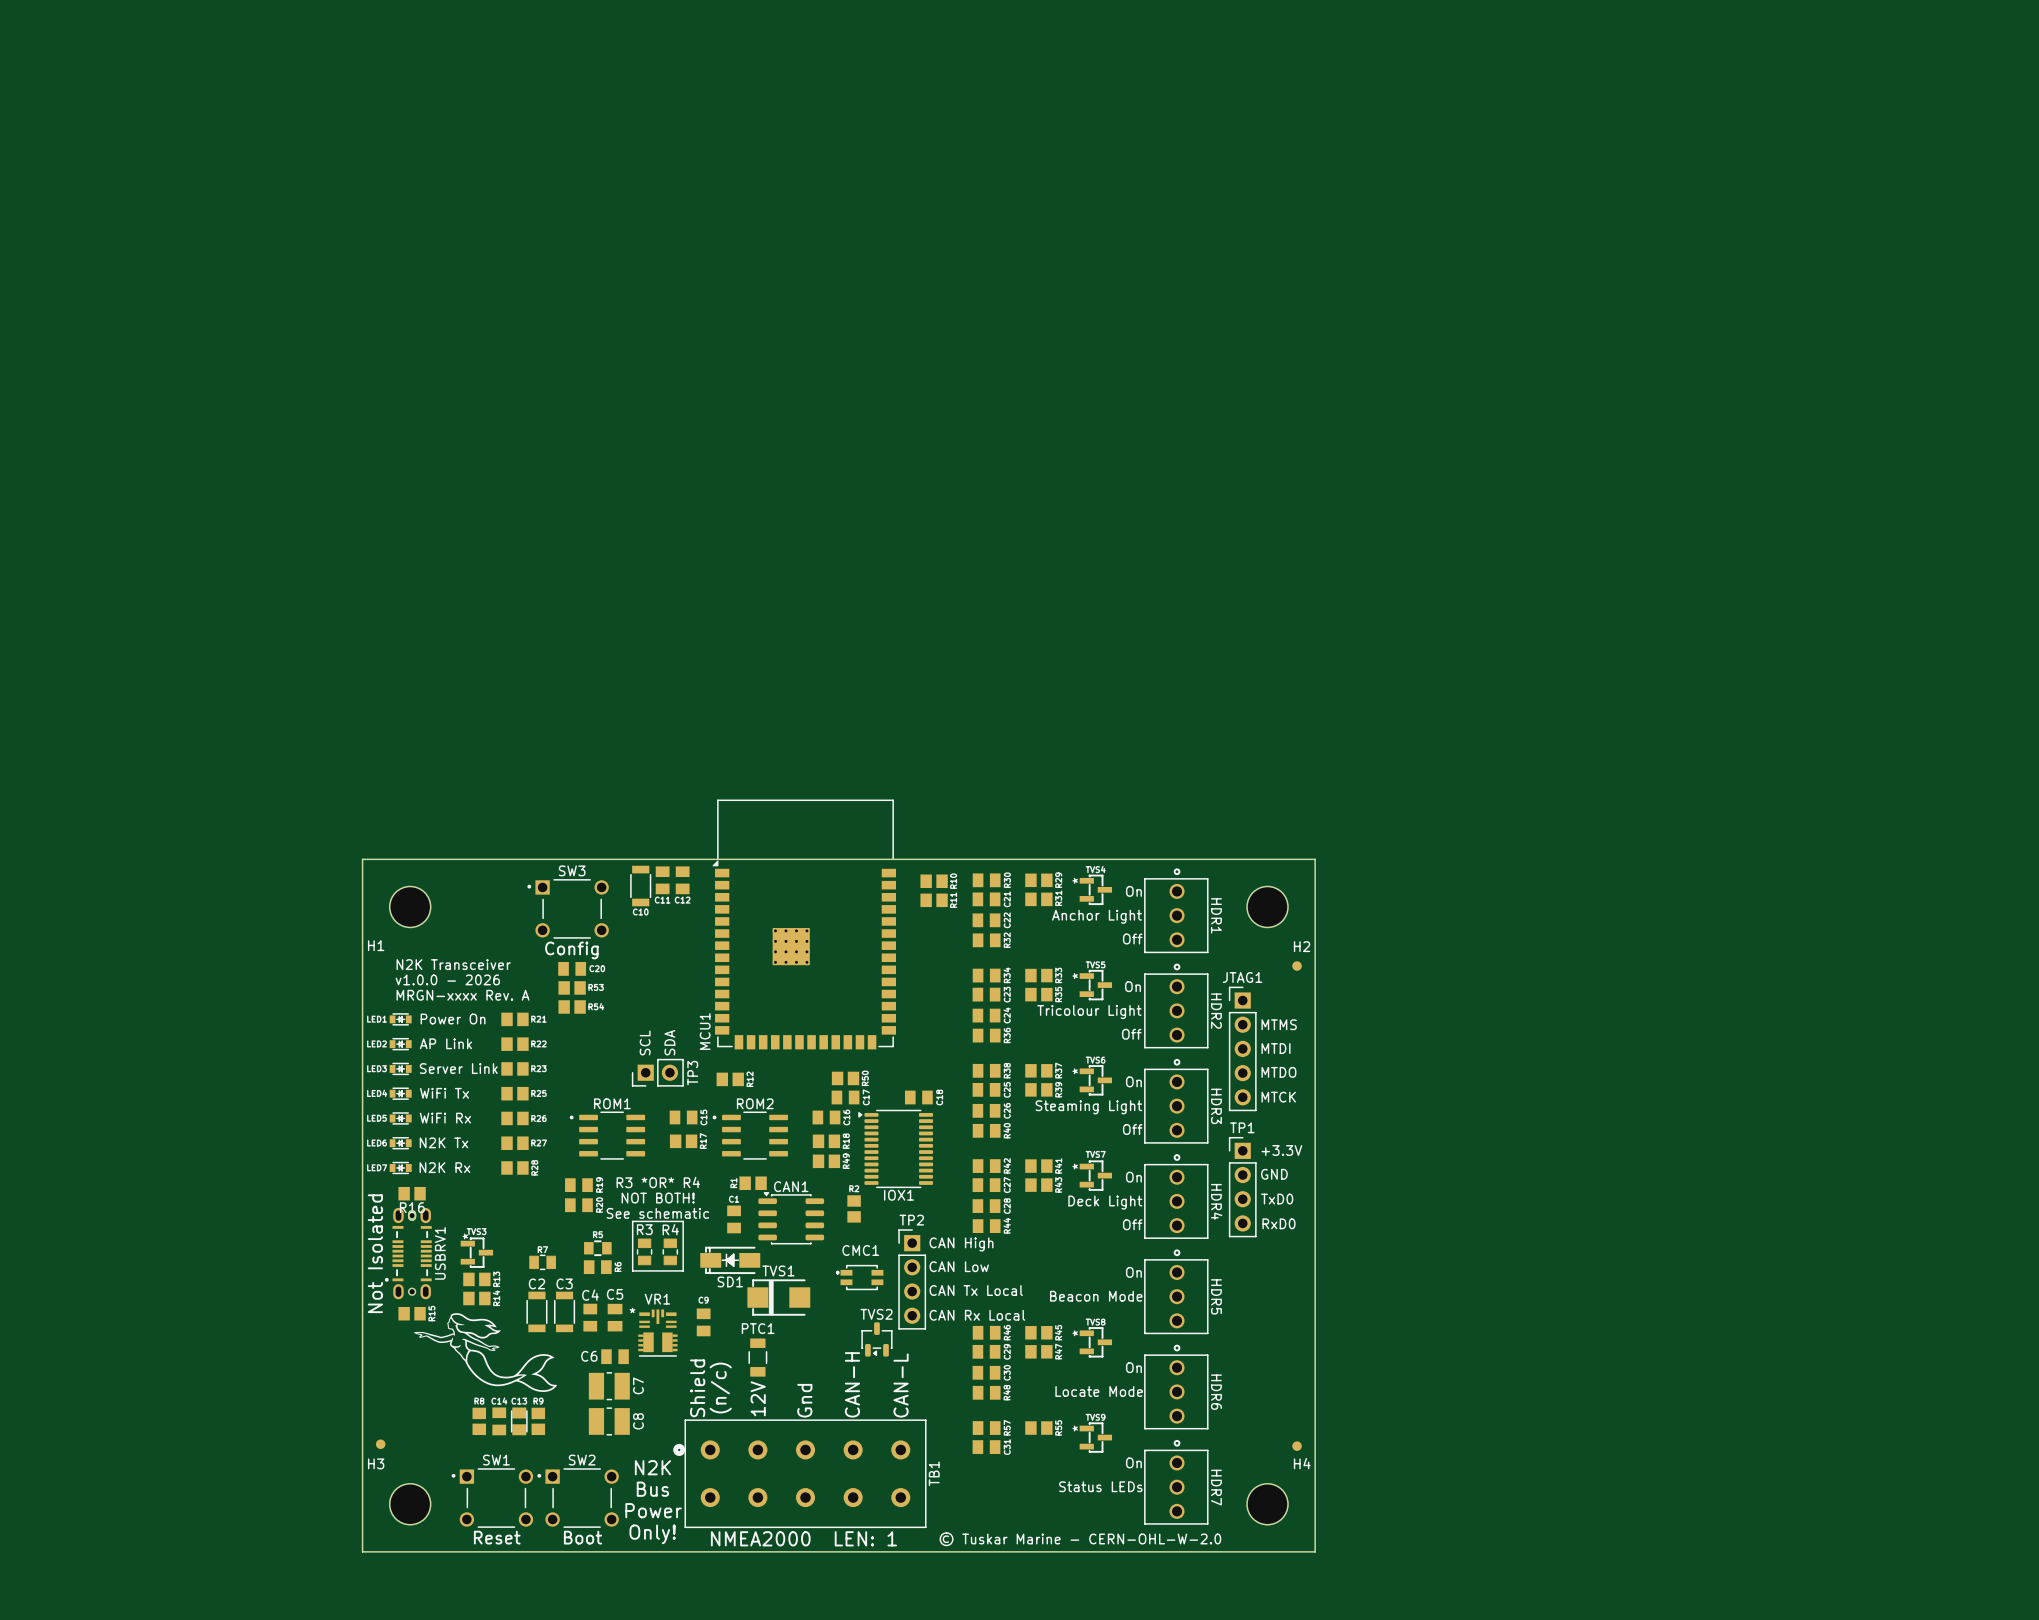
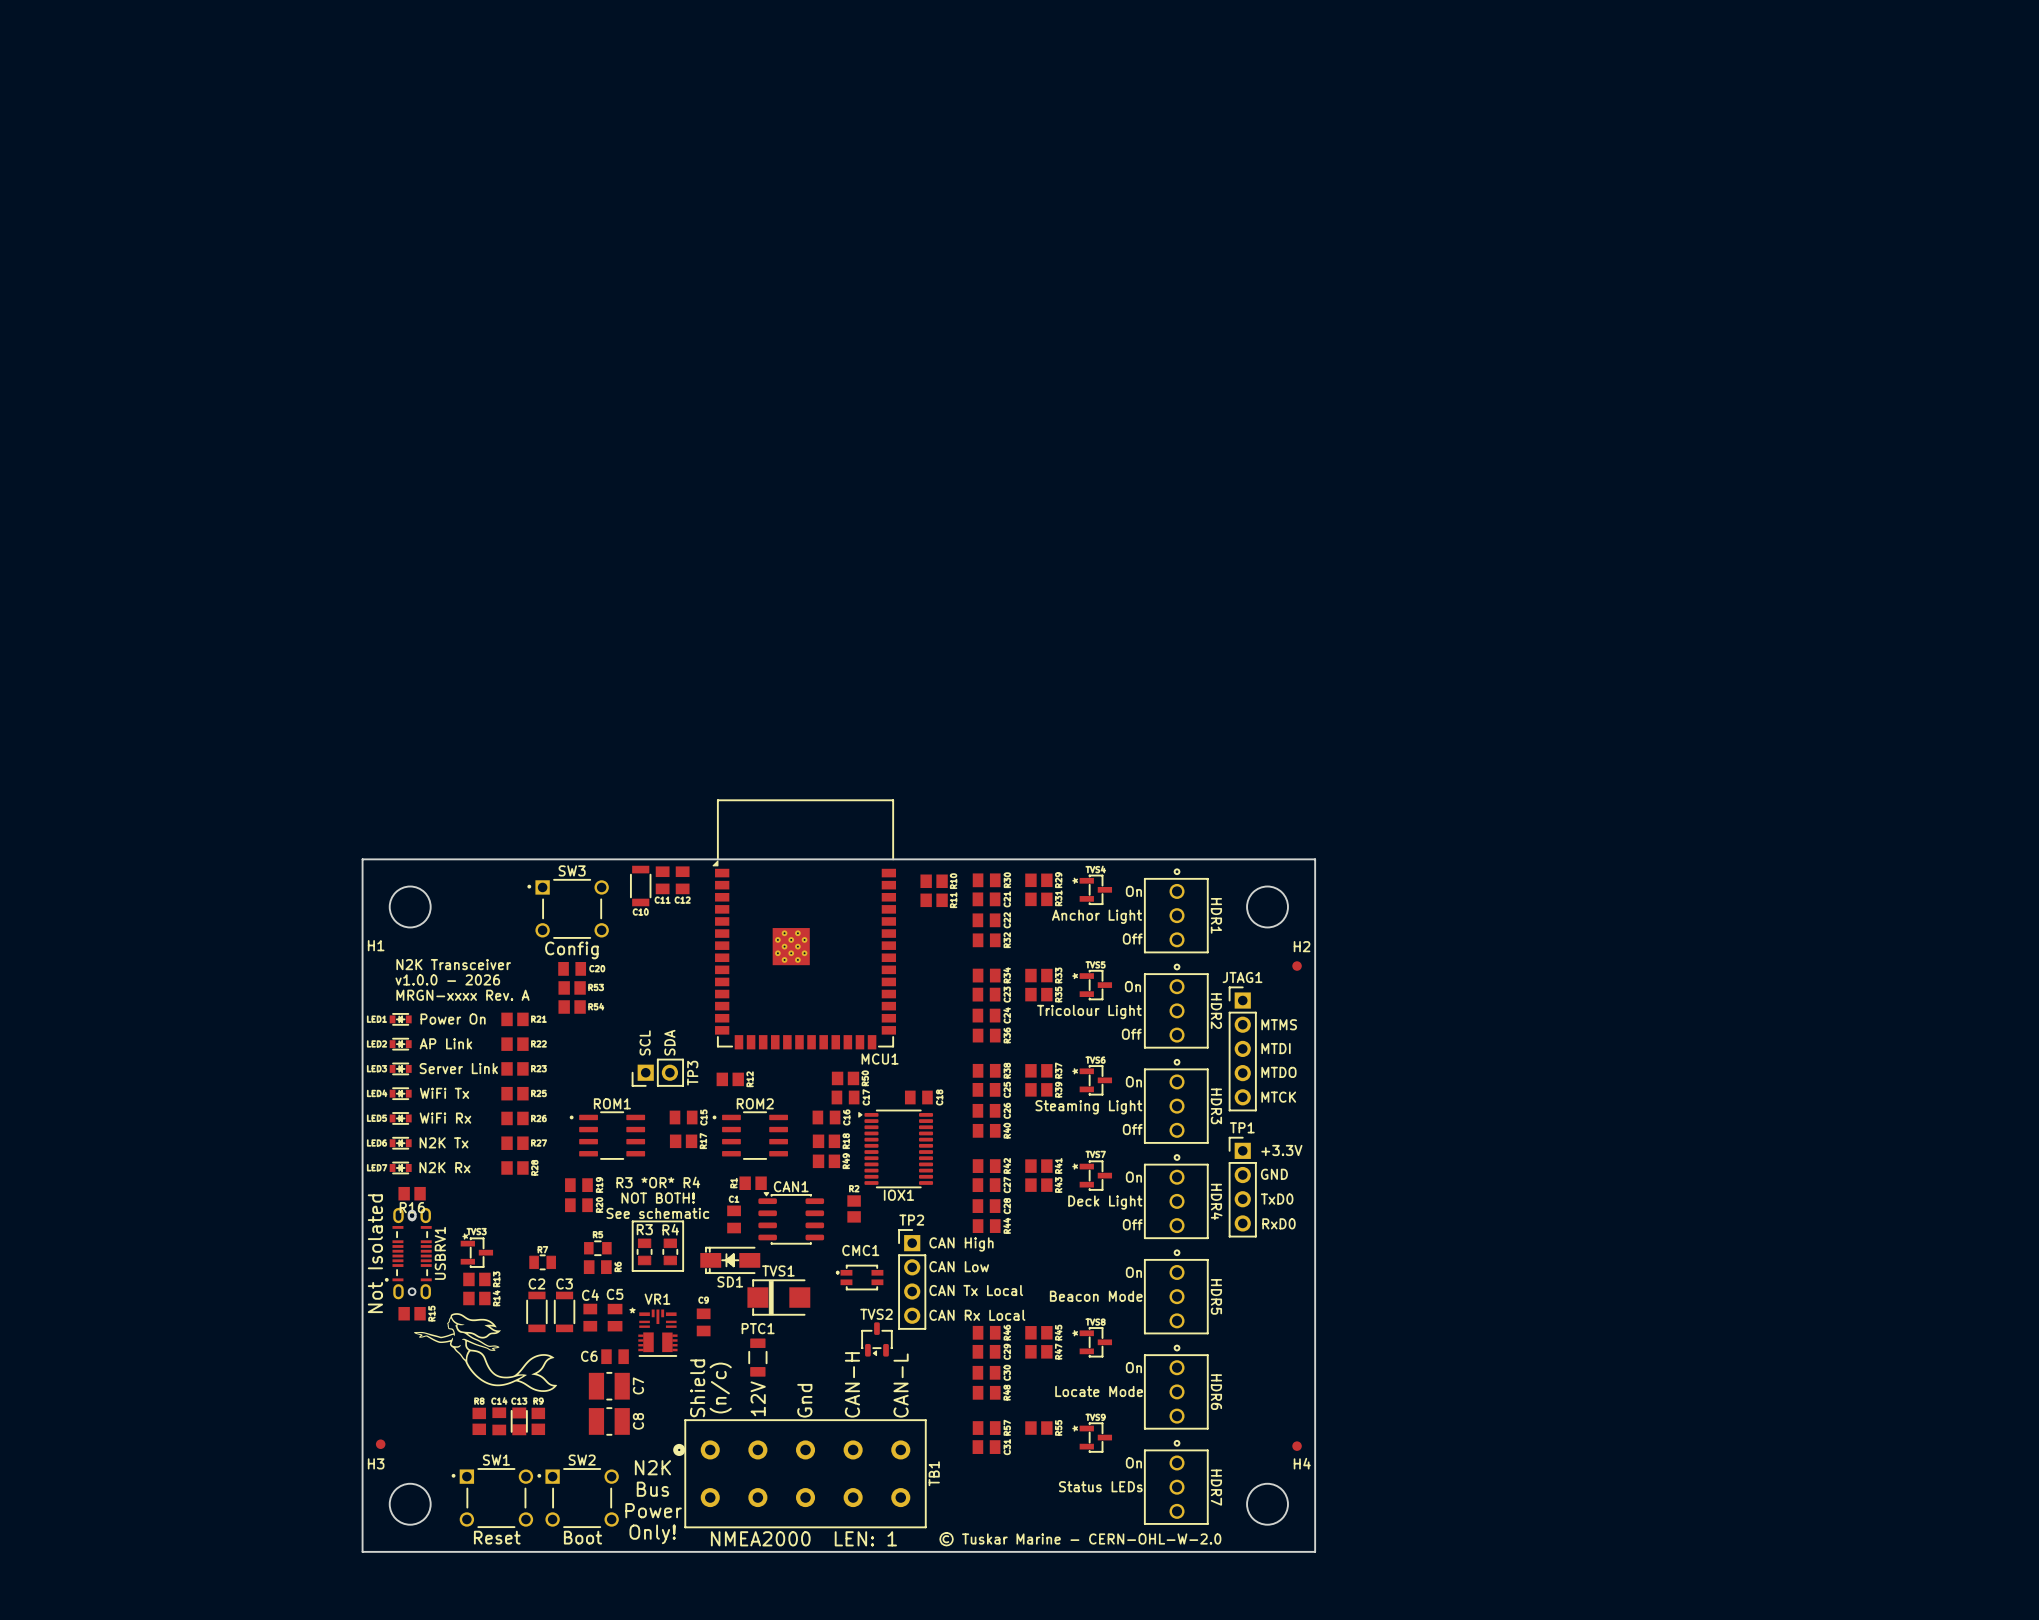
MCU1 footprint: [712, 799, 897, 1050] -> [712, 799, 897, 1050]
MCU1 name position: MCU1 (705, 1031) -> MCU1 (880, 1059)

